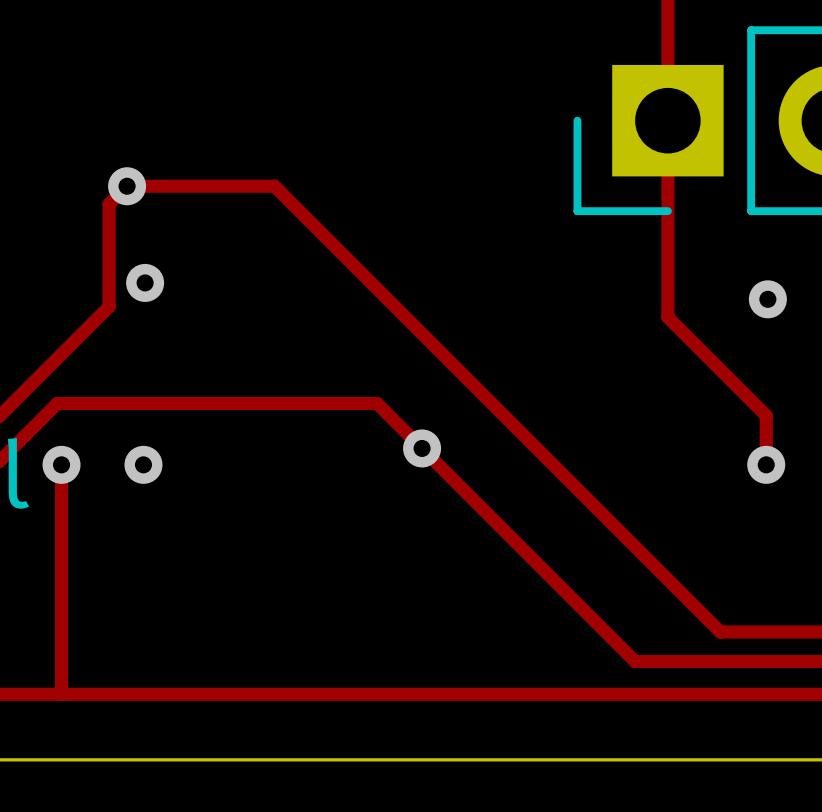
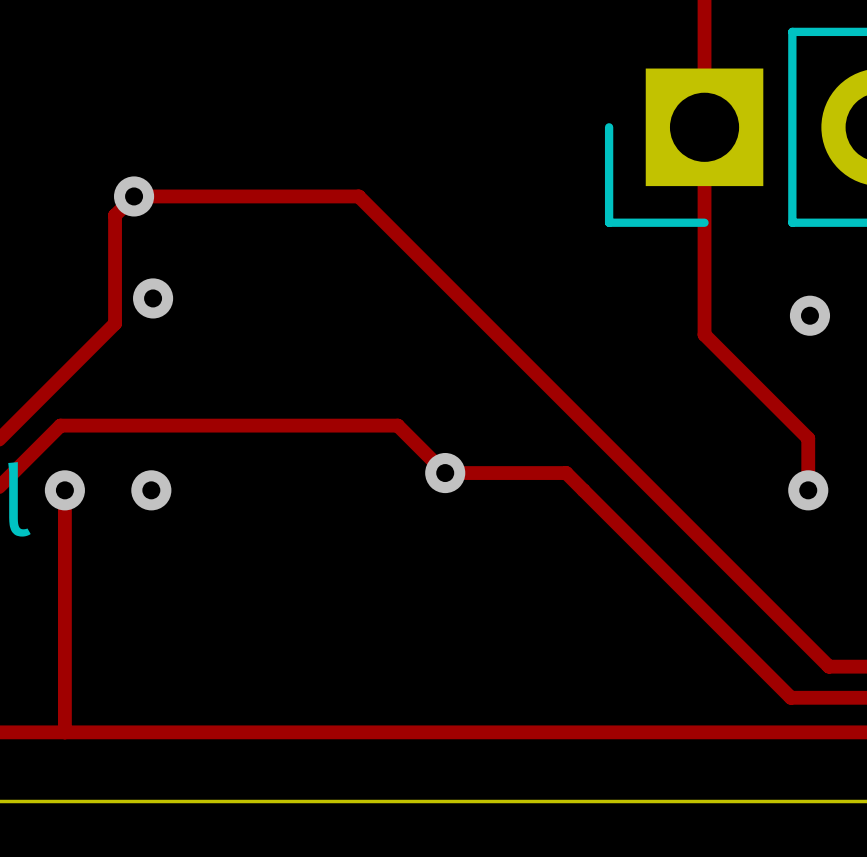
track: (274, 186) (536, 448) -> (445, 473) (566, 473)
track: none -> (289, 196) (358, 196) (828, 666)
track: (422, 448) (635, 661) (749, 661) -> none
track: (720, 632) (785, 632) -> (759, 666) (790, 697)

